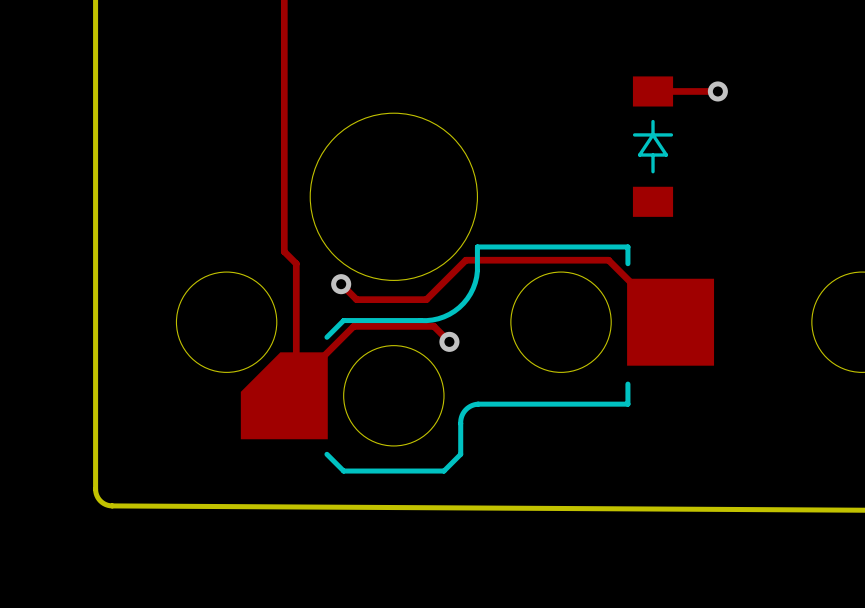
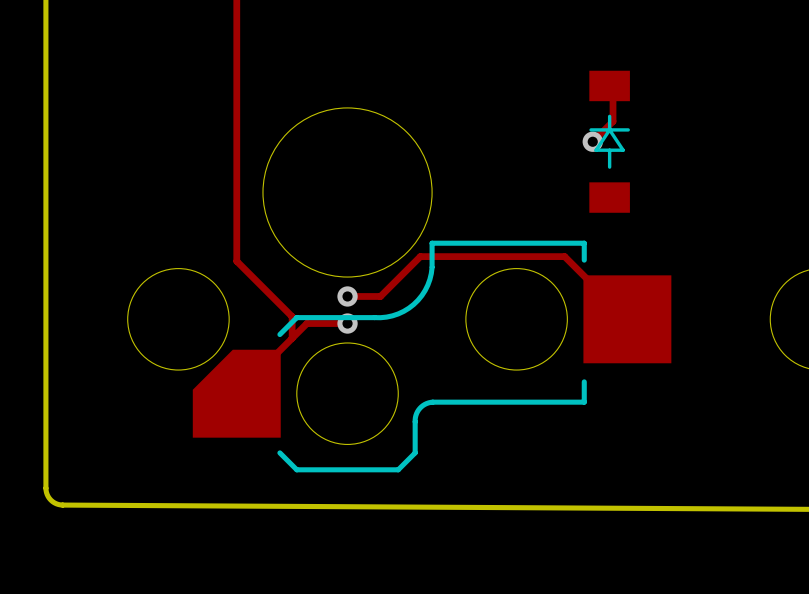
track: (653, 91) (717, 91) -> none
track: none -> (613, 85) (613, 121) (592, 141)
via position: (717, 91) -> (592, 141)
track: (284, 251) (296, 263) (296, 383) -> (236, 248) (236, 261) (292, 316) (292, 338)
track: (341, 284) (356, 299) (393, 299) -> none
via: (341, 284) -> none
via: none -> (347, 296)
track: (393, 326) (433, 326) (449, 341) -> none
via: none -> (347, 323)
via: (449, 341) -> none

